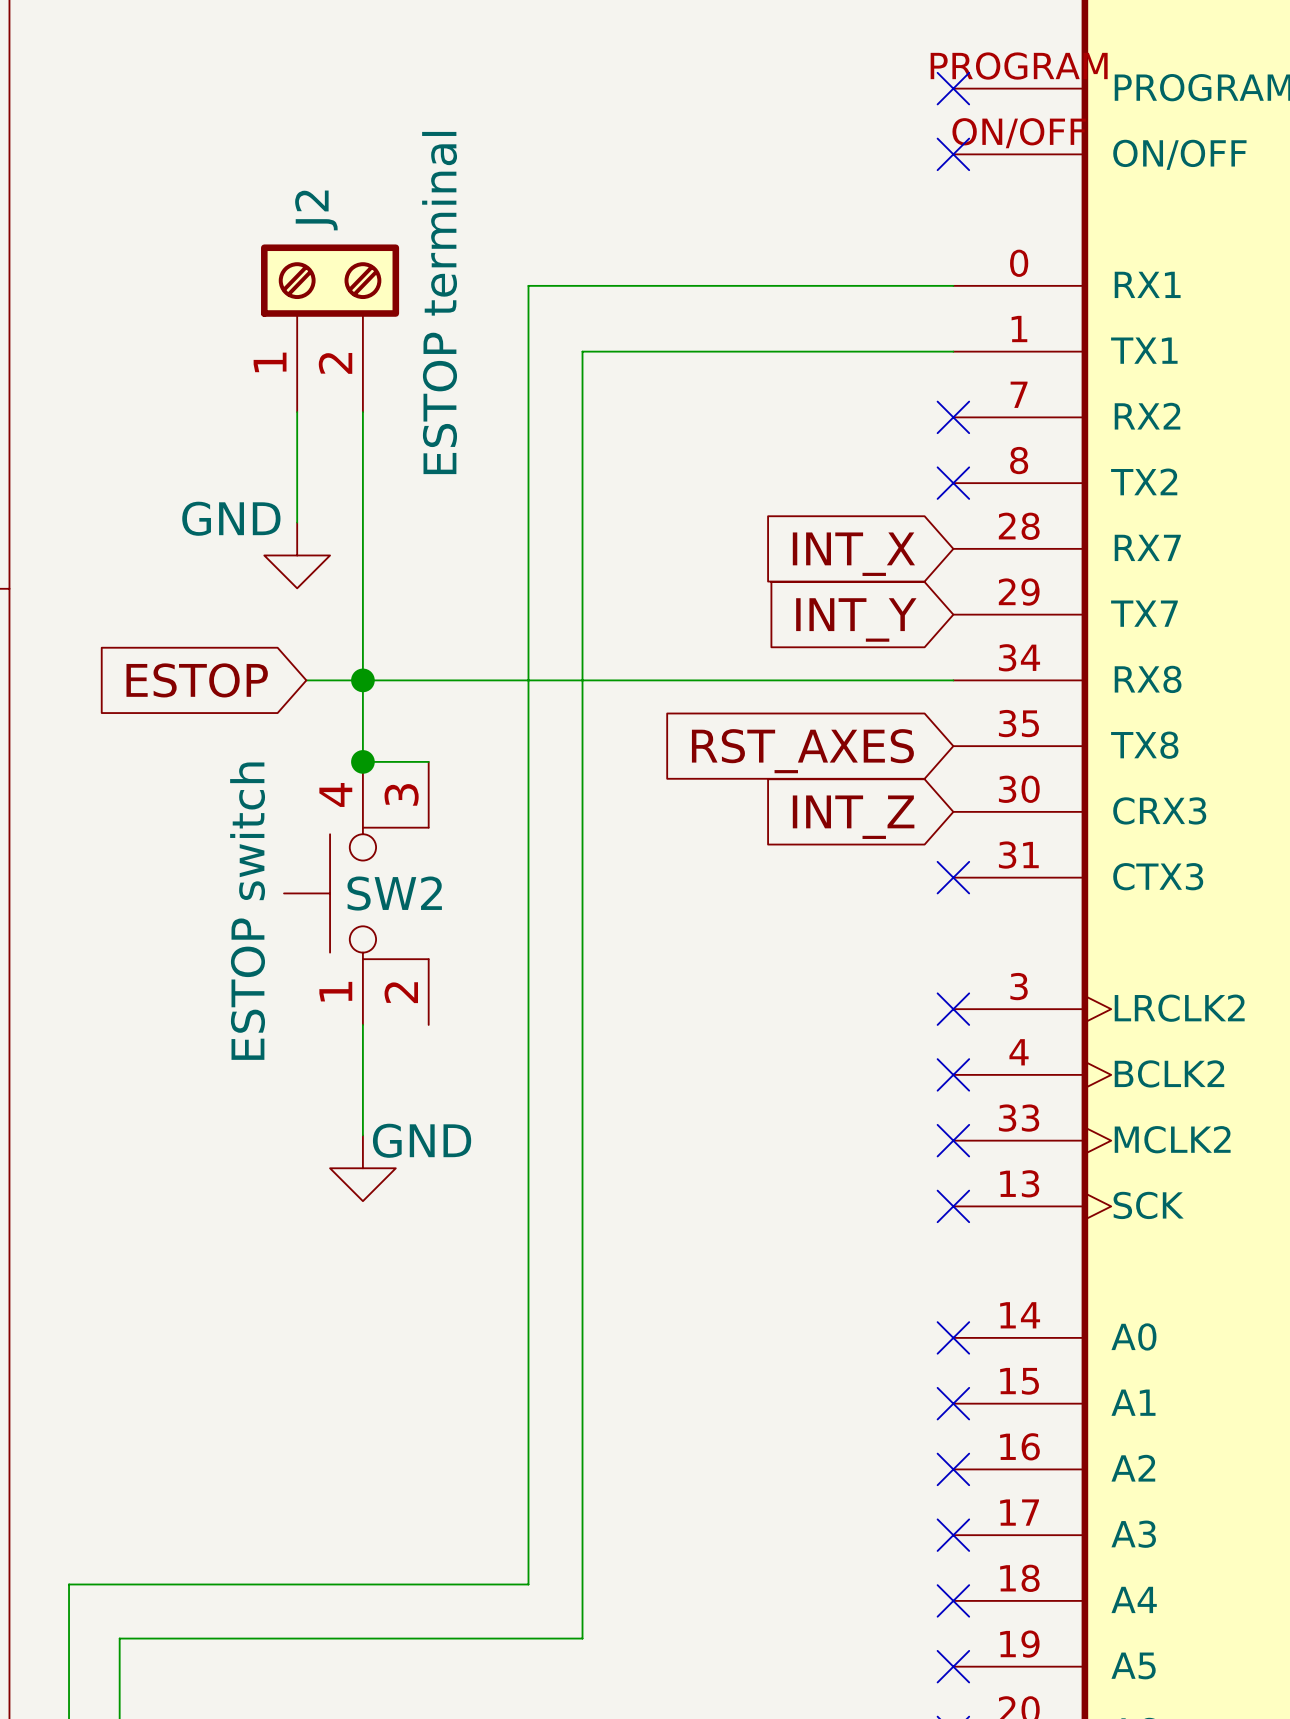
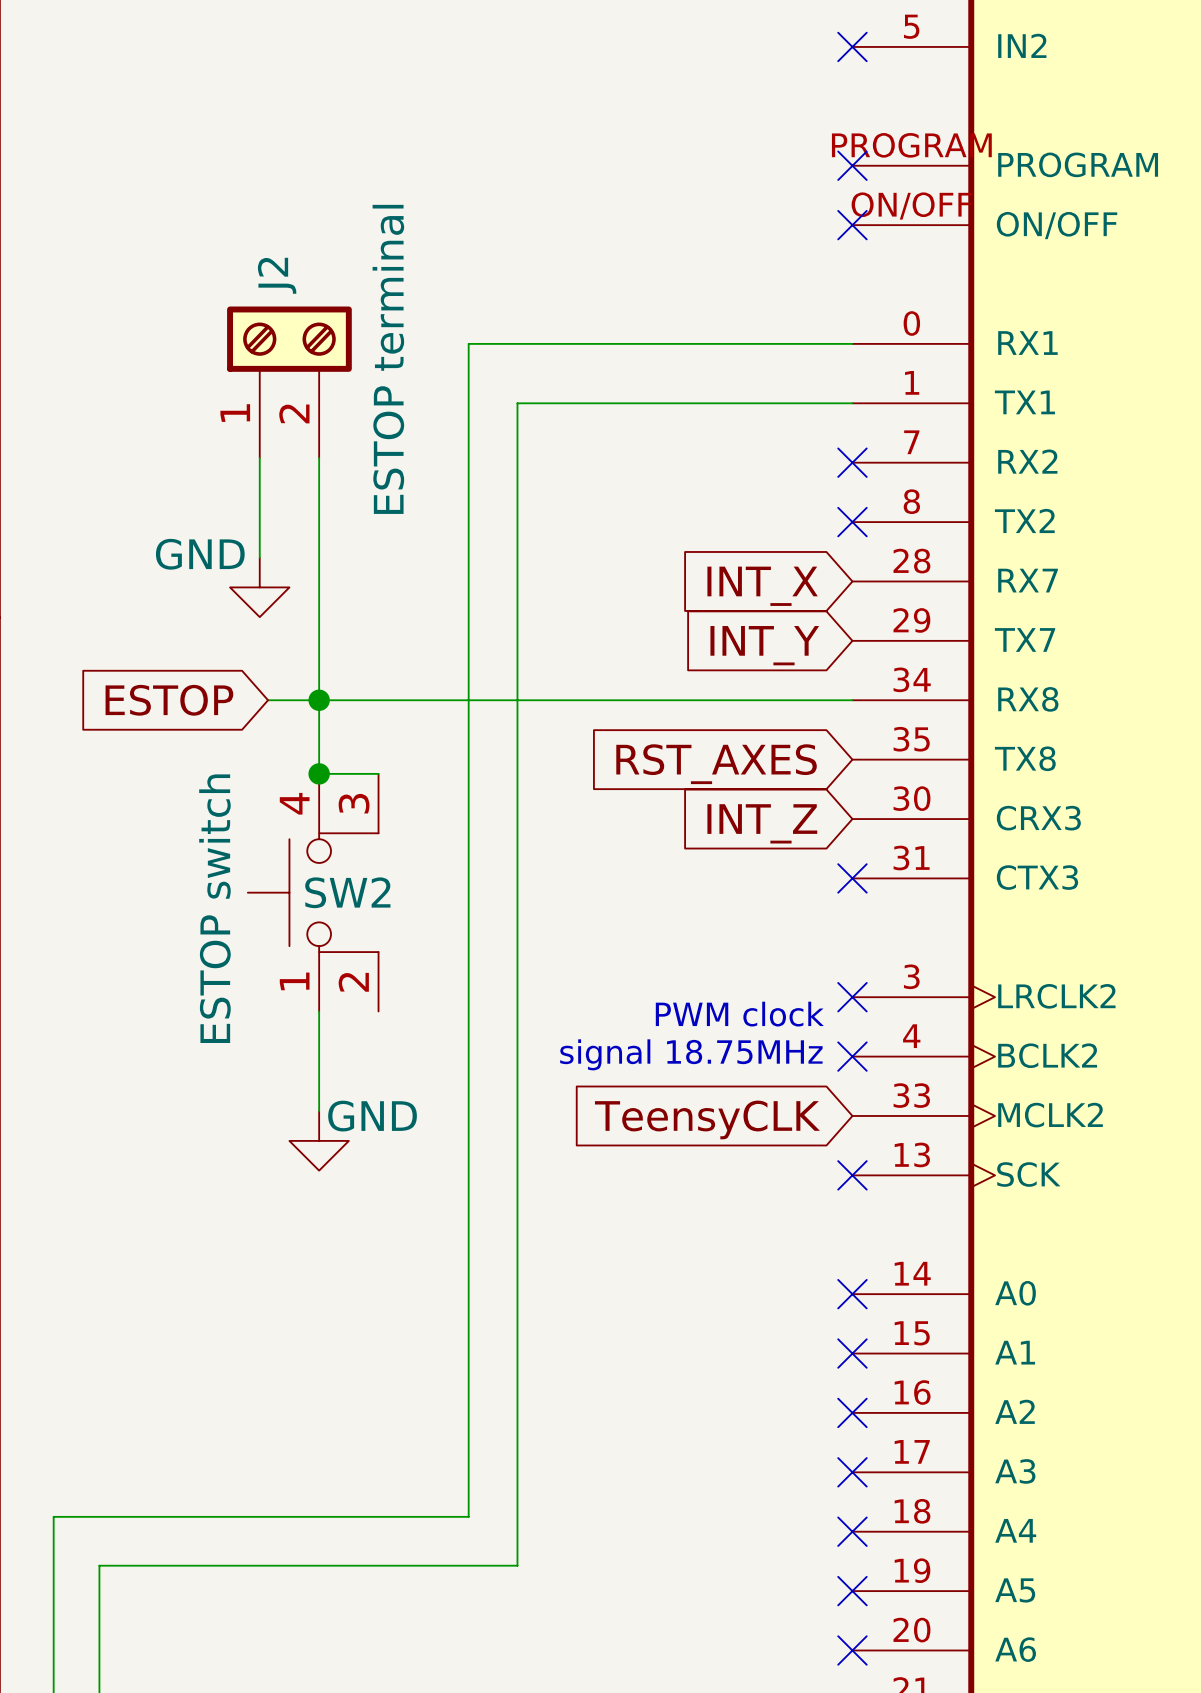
text: none -> PWM clock (739, 1014)
text: none -> signal 18.75MHz (691, 1054)
no-connect mark: (953, 1140) -> none
global label: none -> TeensyCLK (707, 1119)

